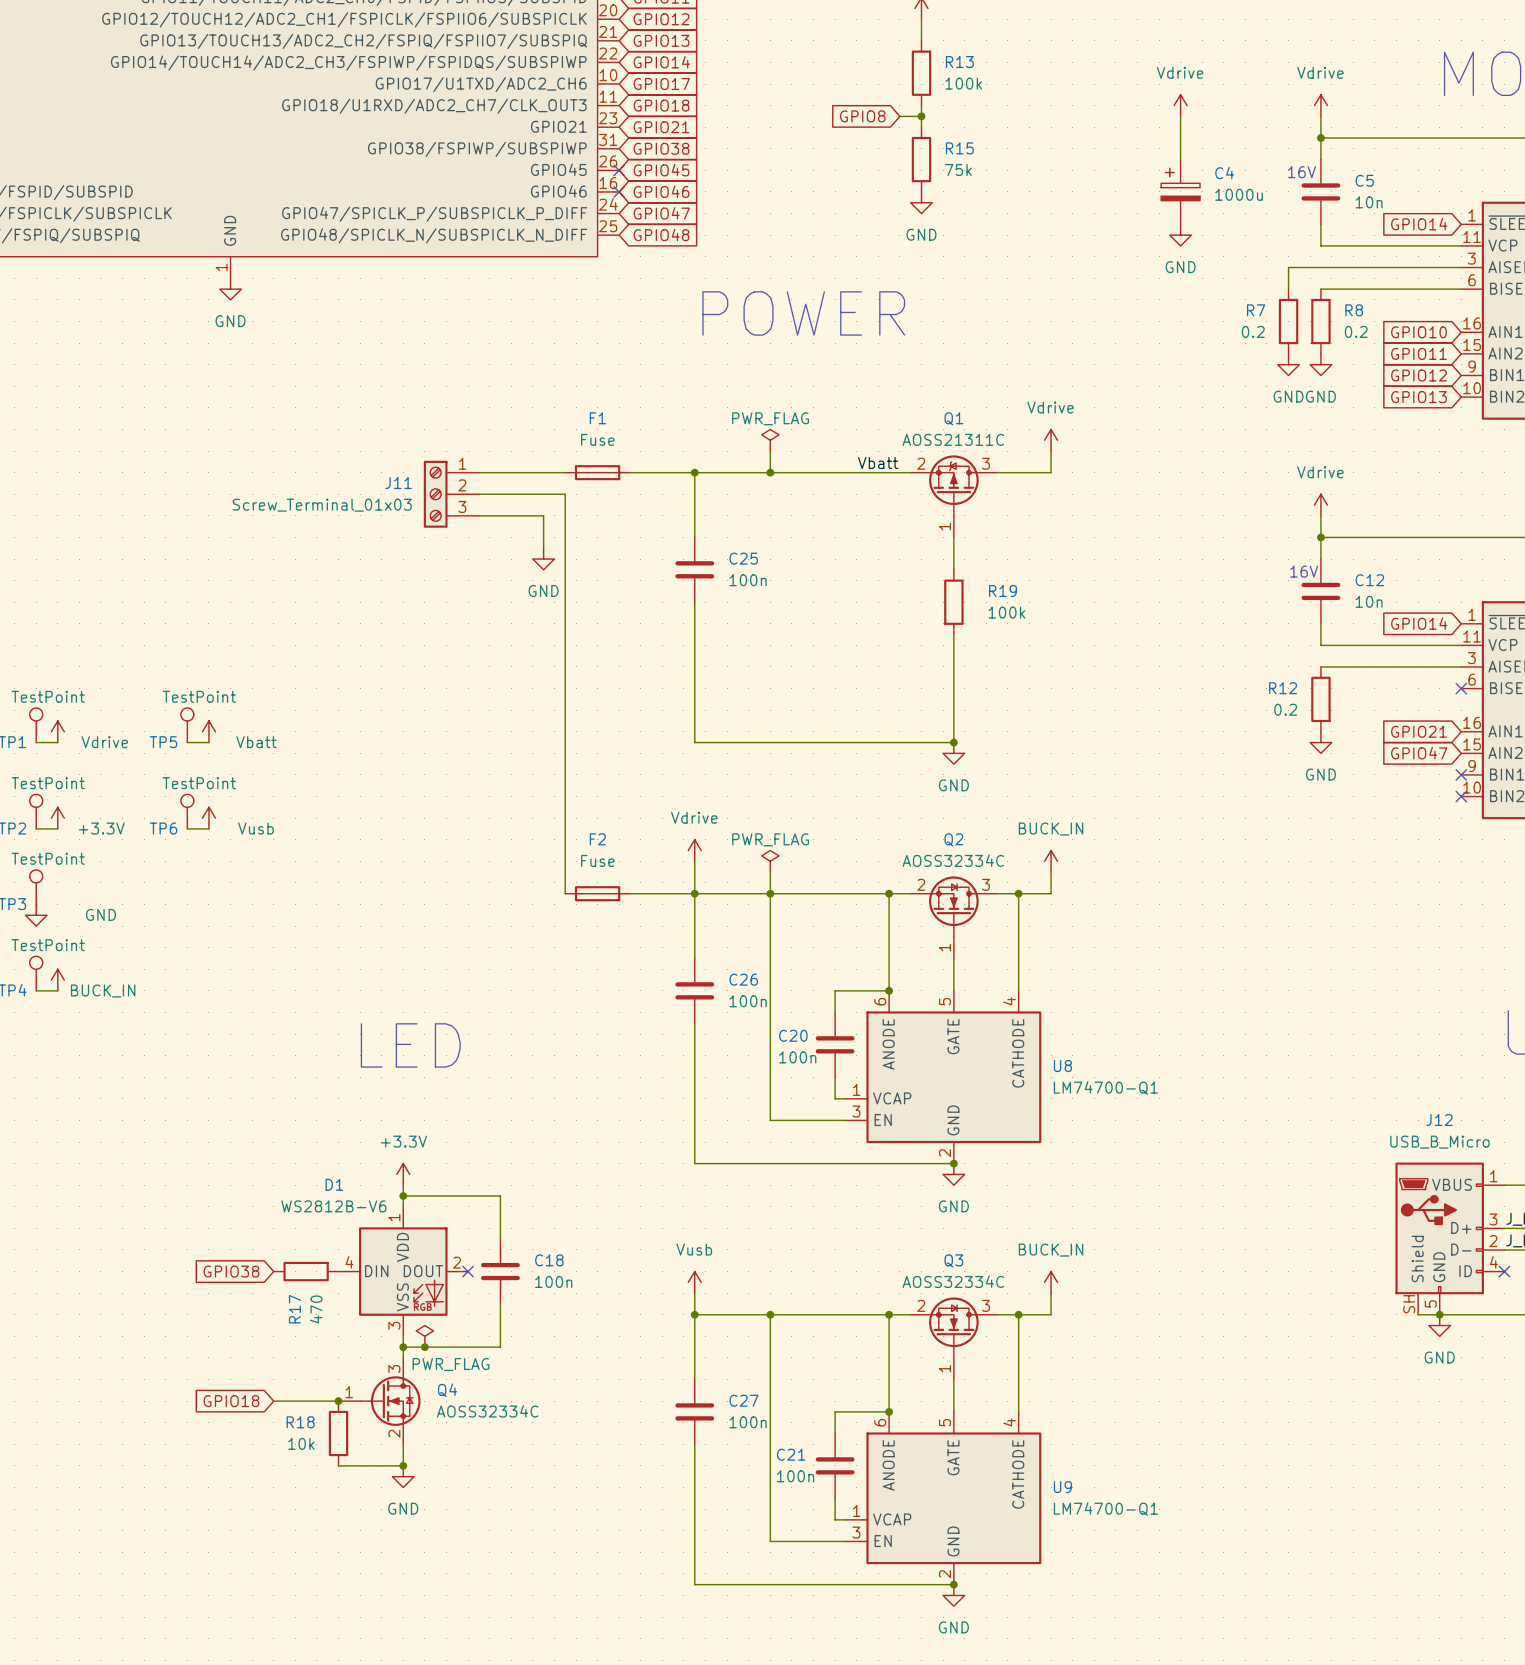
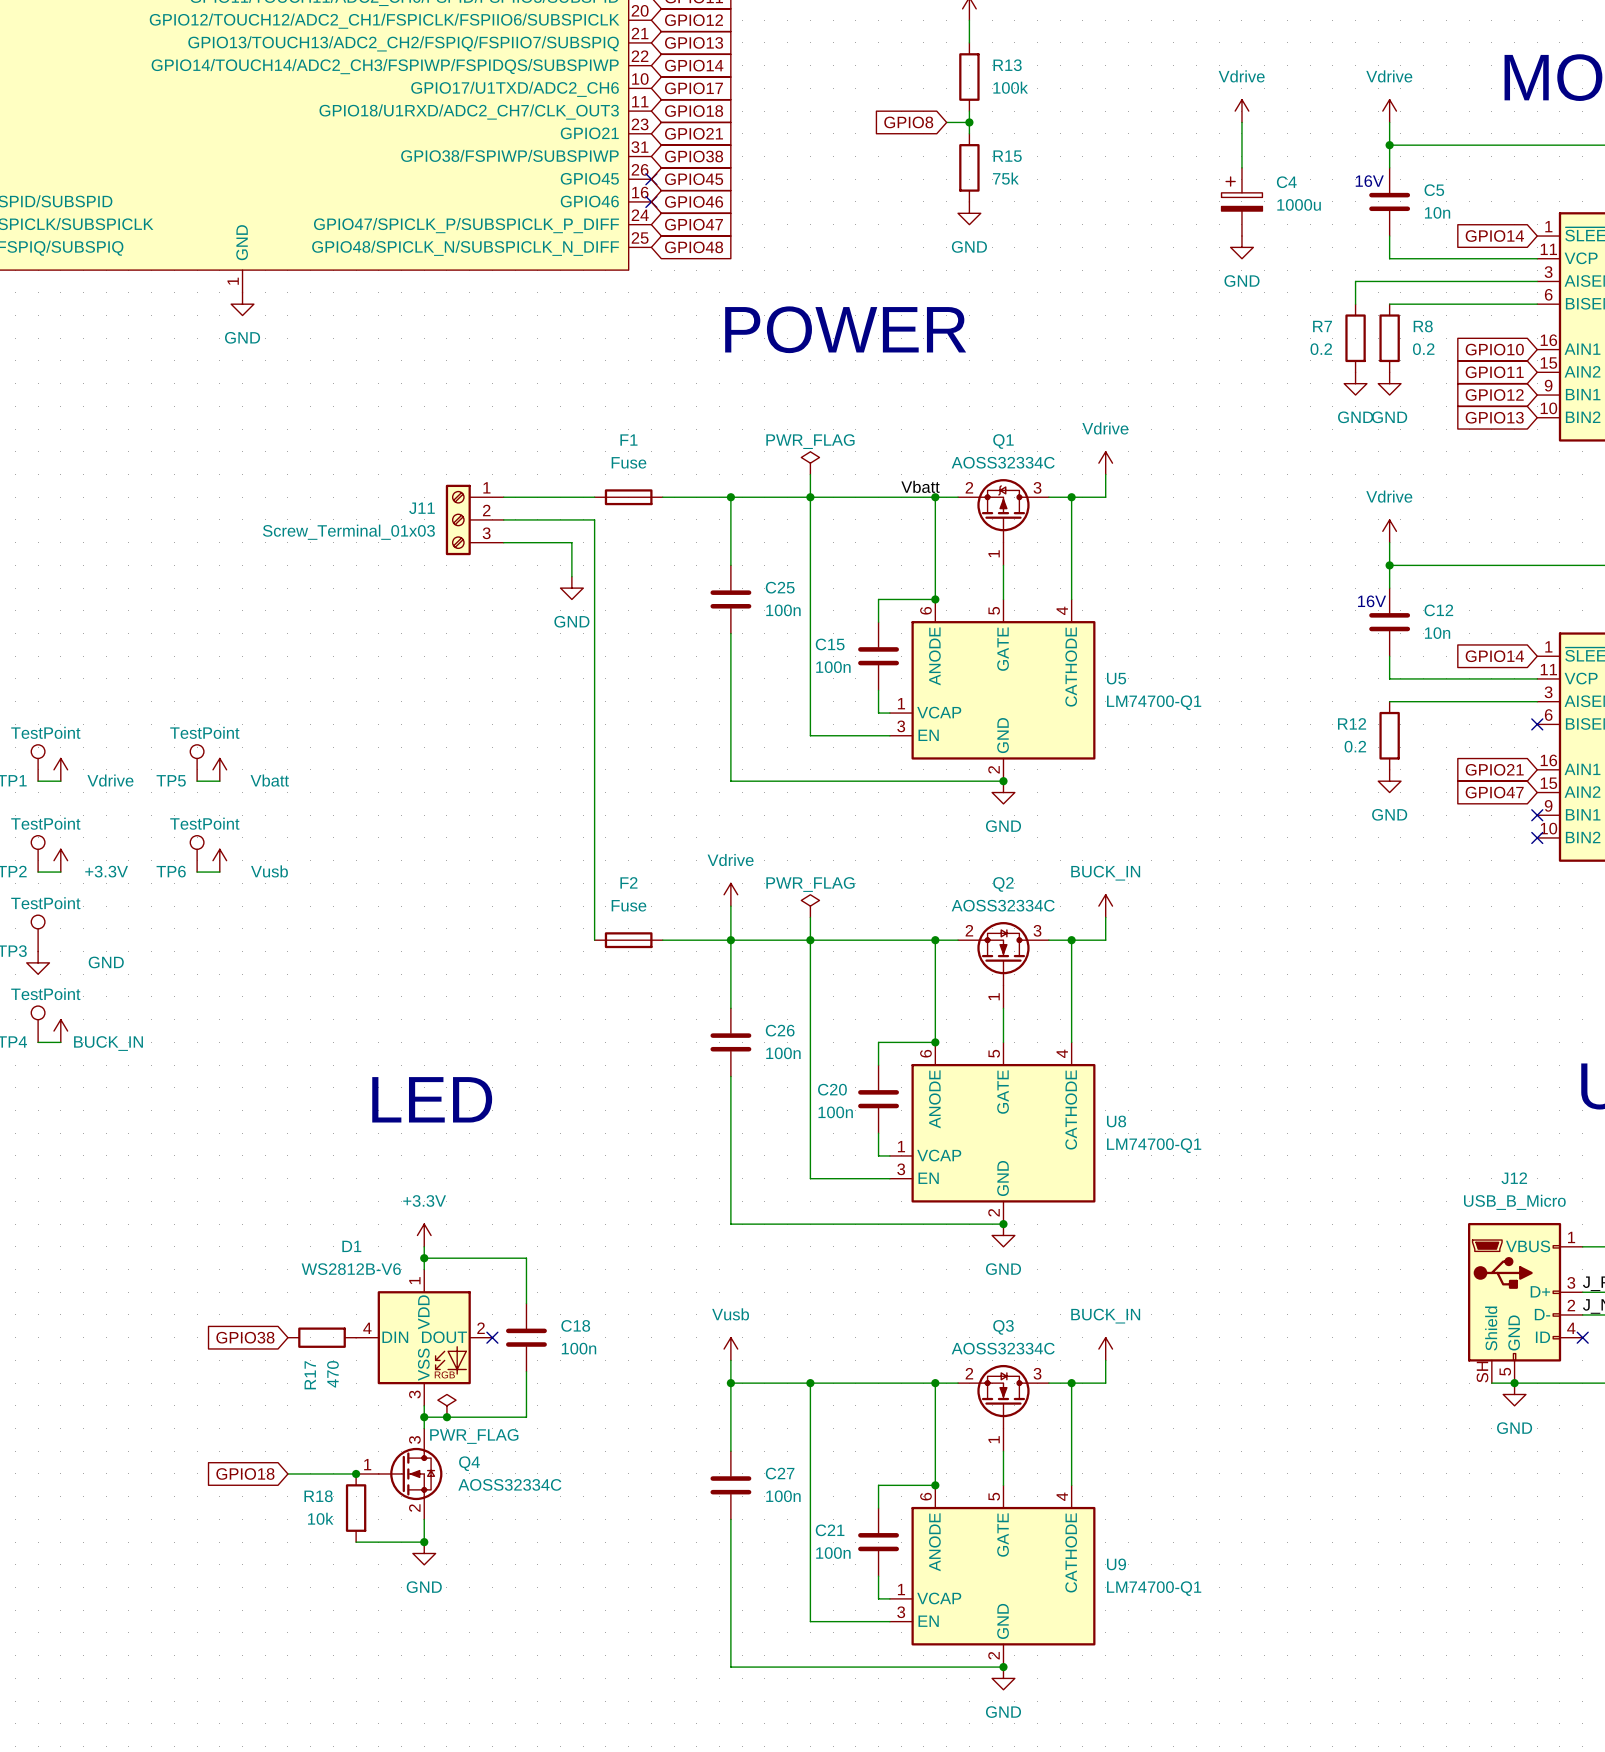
Q1 value: AOSS21311C (953, 439) -> AOSS32334C (1003, 462)
wire: none -> (810, 497) (810, 735) (889, 735)
wire: none -> (935, 497) (935, 599) (878, 599) (878, 622)
junction: none -> (935, 497)
wire: none -> (1071, 497) (1071, 599)
junction: none -> (1071, 497)
junction: none -> (935, 599)
R19: 100k (953, 602) -> none
C15: none -> 100n (878, 656)
wire: none -> (878, 690) (878, 713) (889, 713)
U5: none -> LM74700-Q1 (992, 690)

